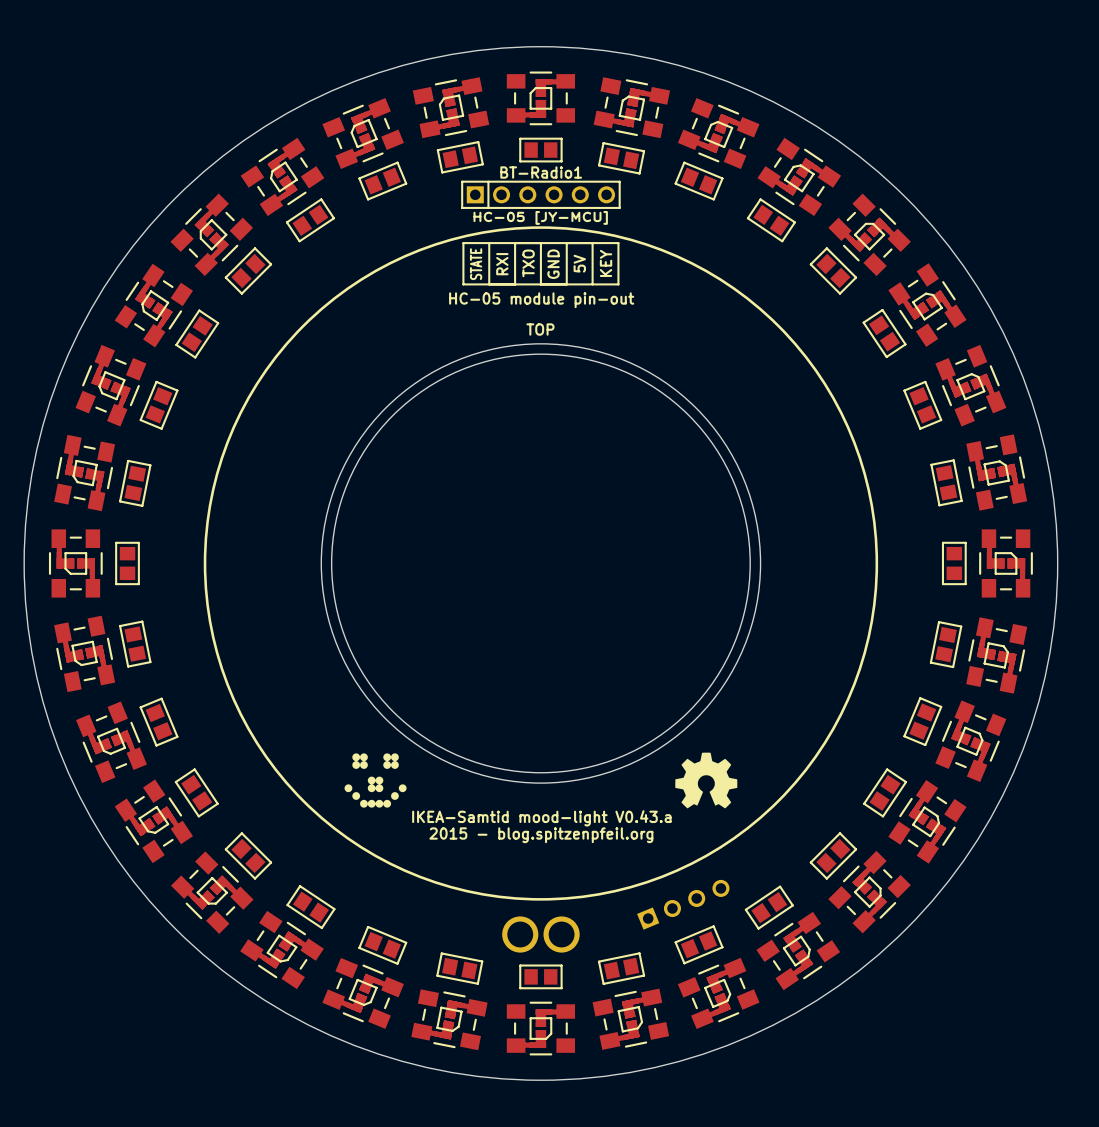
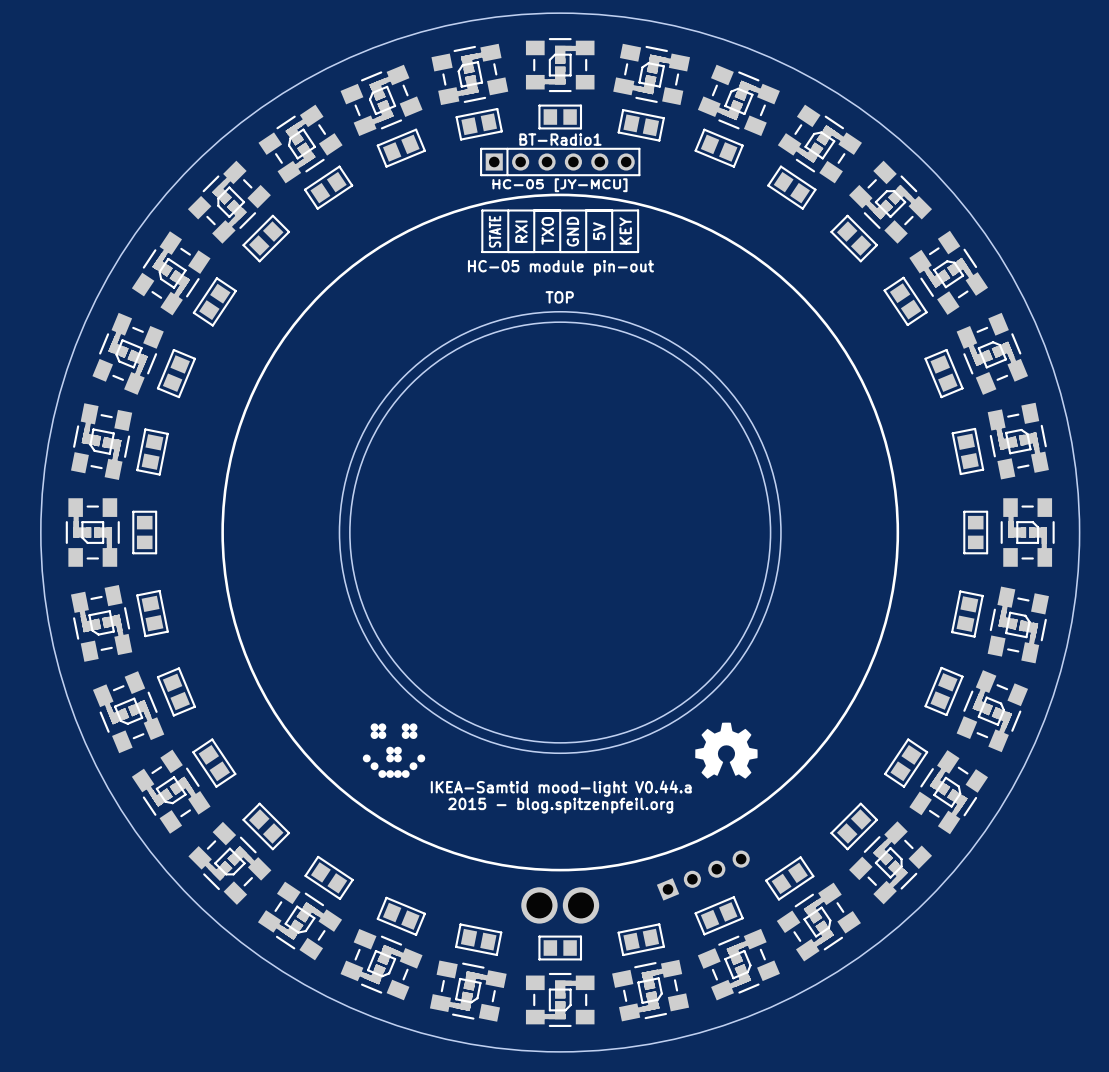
text: IKEA-Samtid mood-light V0.43.a (541, 818) -> IKEA-Samtid mood-light V0.44.a (561, 788)

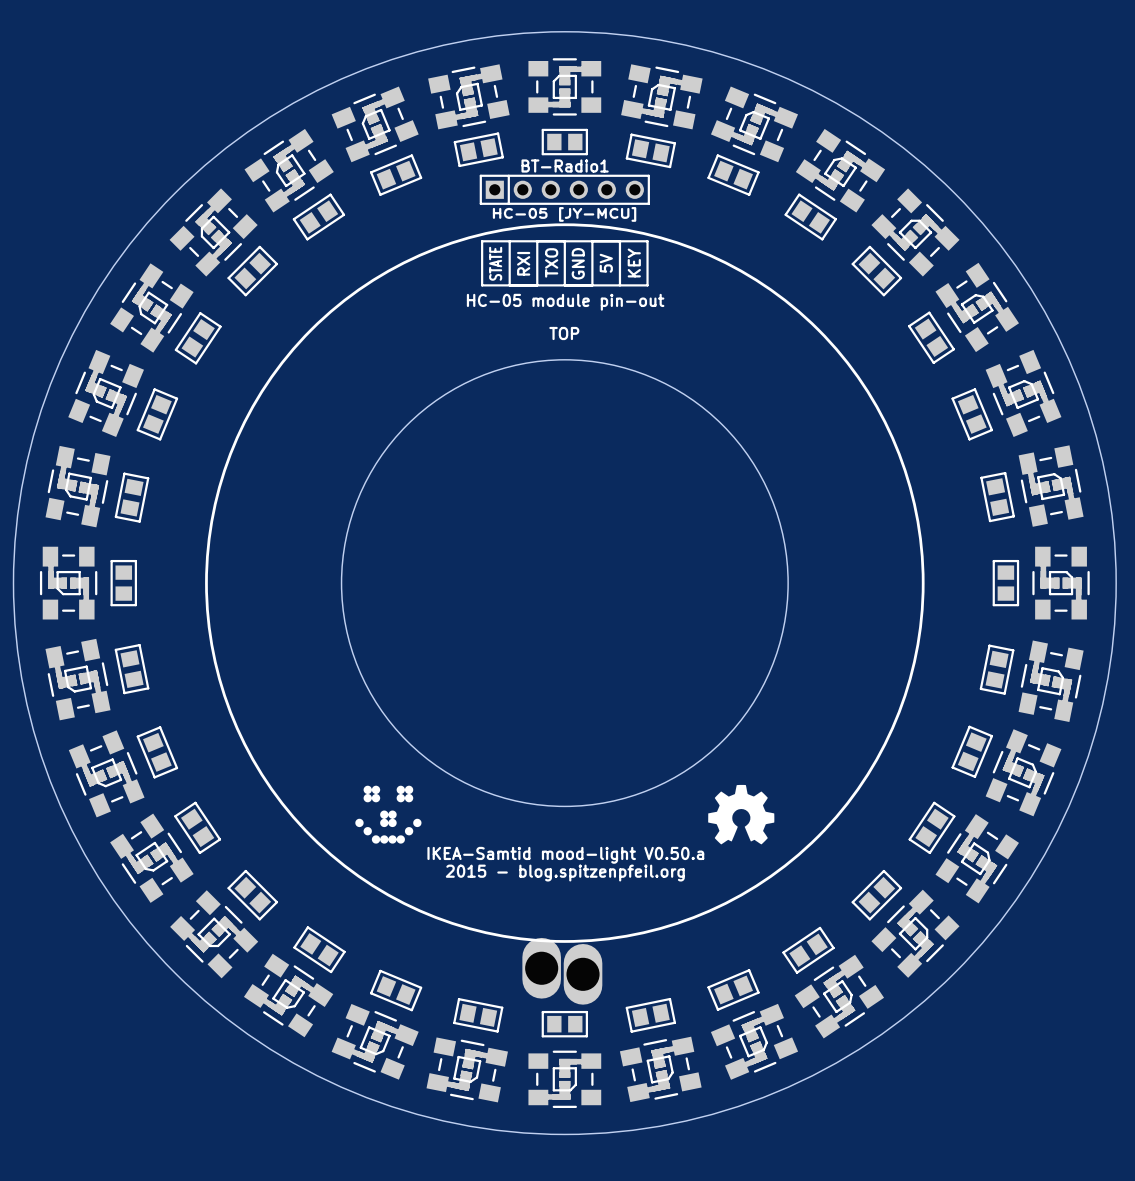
round board edge: [338, 311, 782, 754] -> none
text: IKEA-Samtid mood-light V0.44.a (561, 788) -> IKEA-Samtid mood-light V0.50.a (565, 855)
part: (703, 875) -> none
part footprint: [521, 887, 600, 924] -> [522, 937, 603, 1005]

